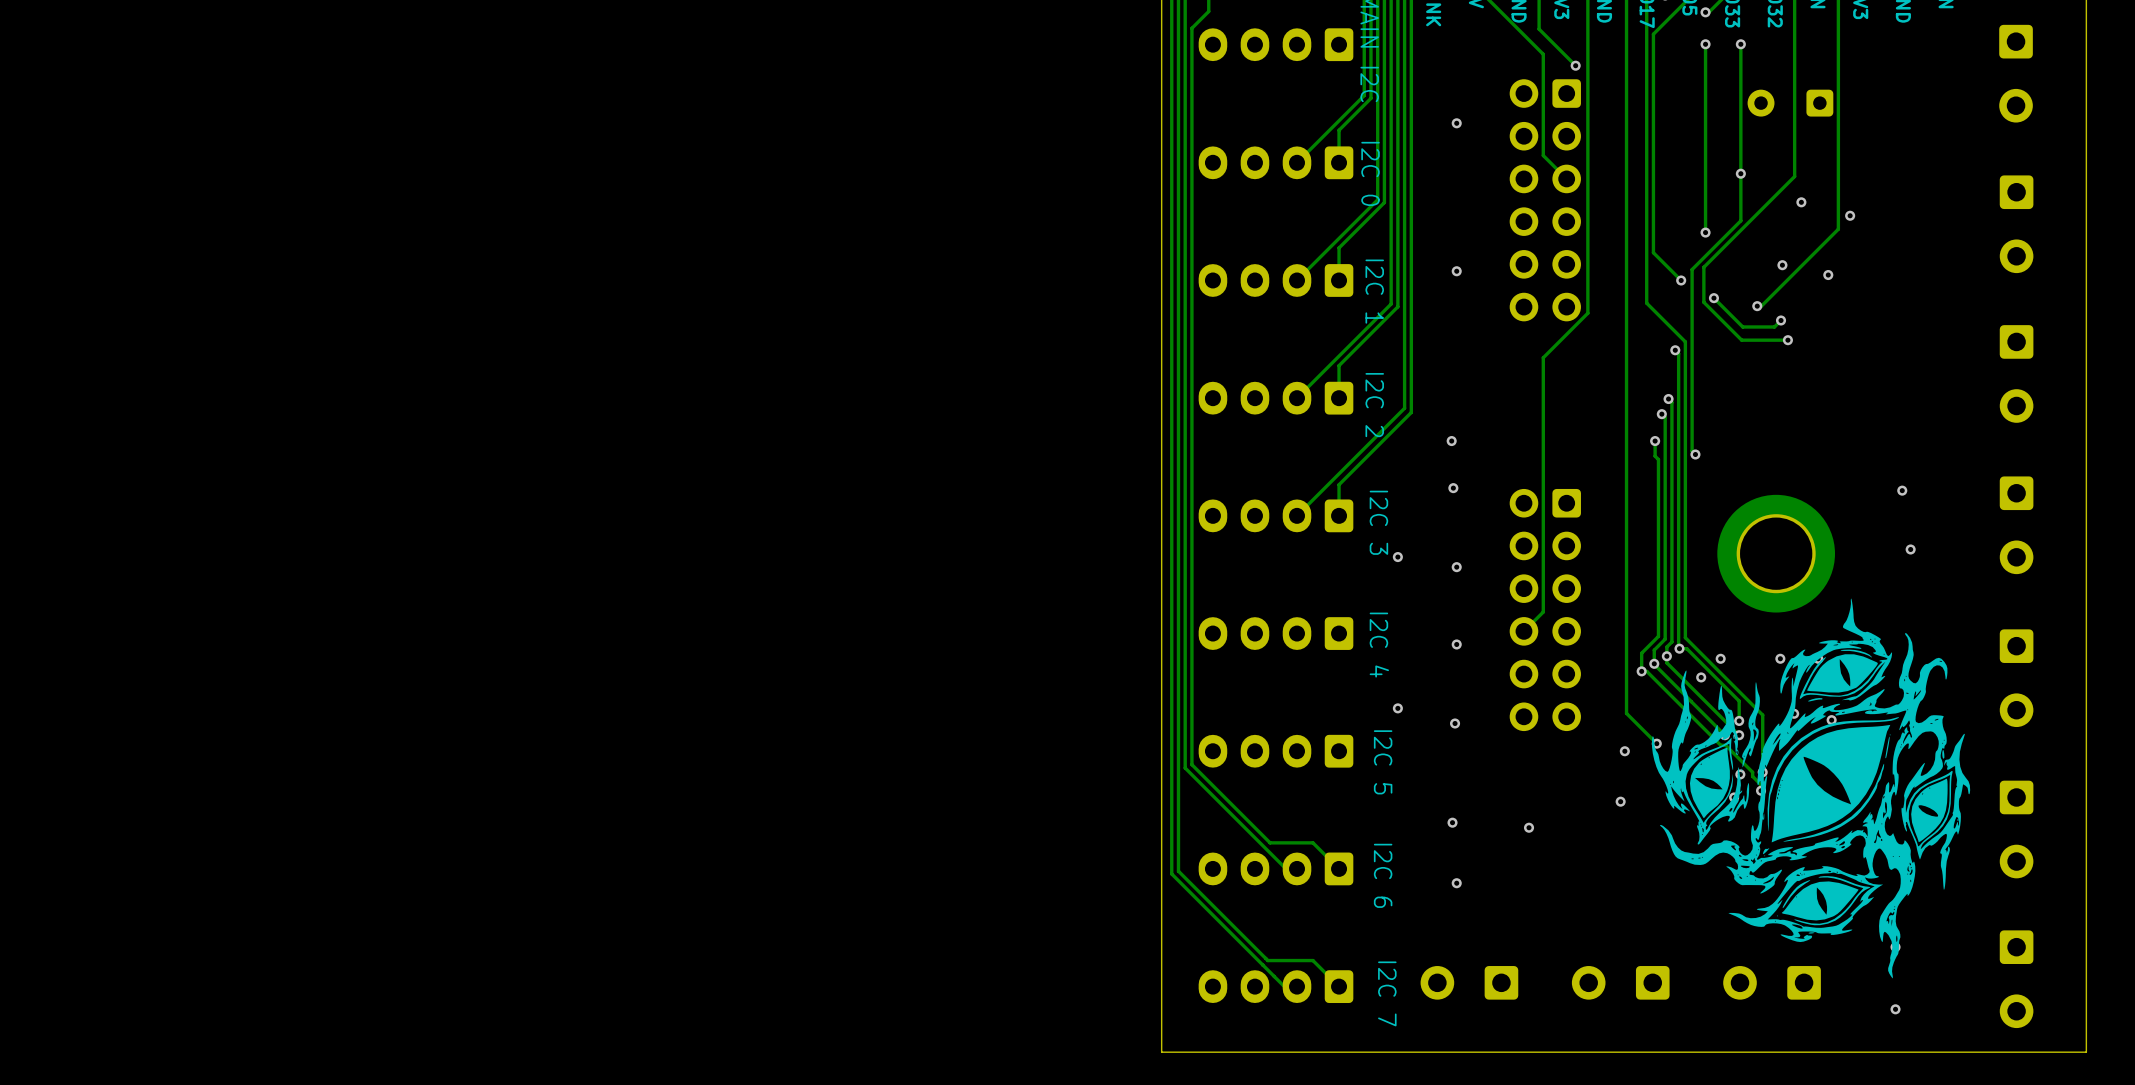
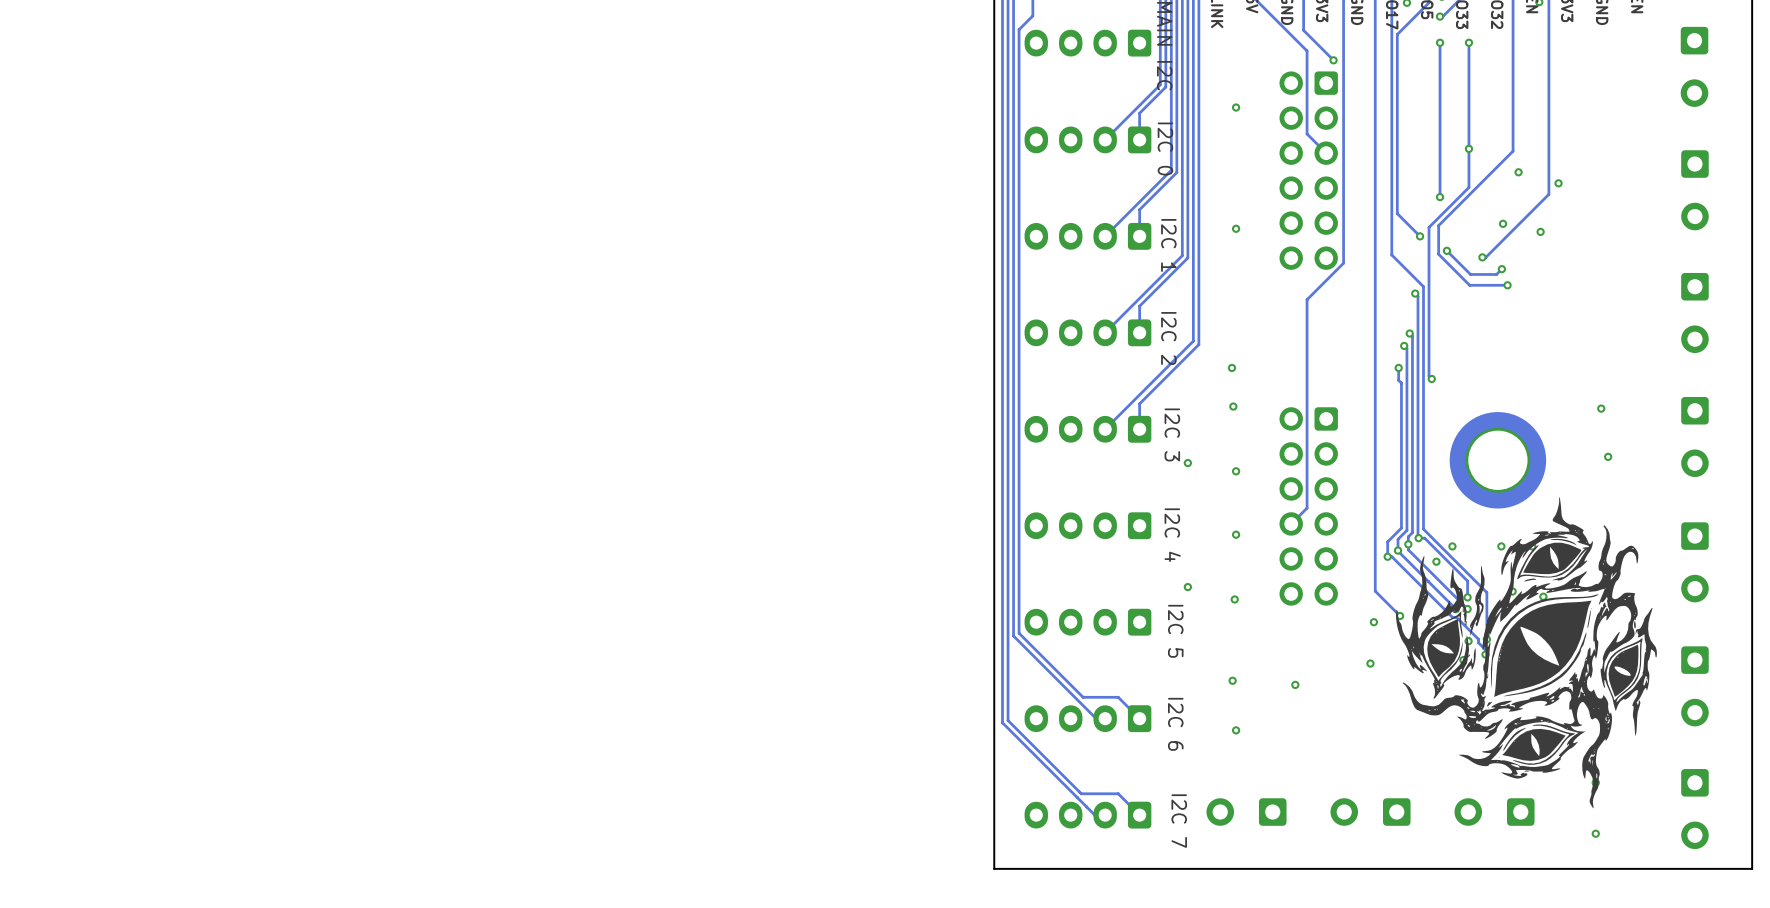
part: (1790, 103) -> none

